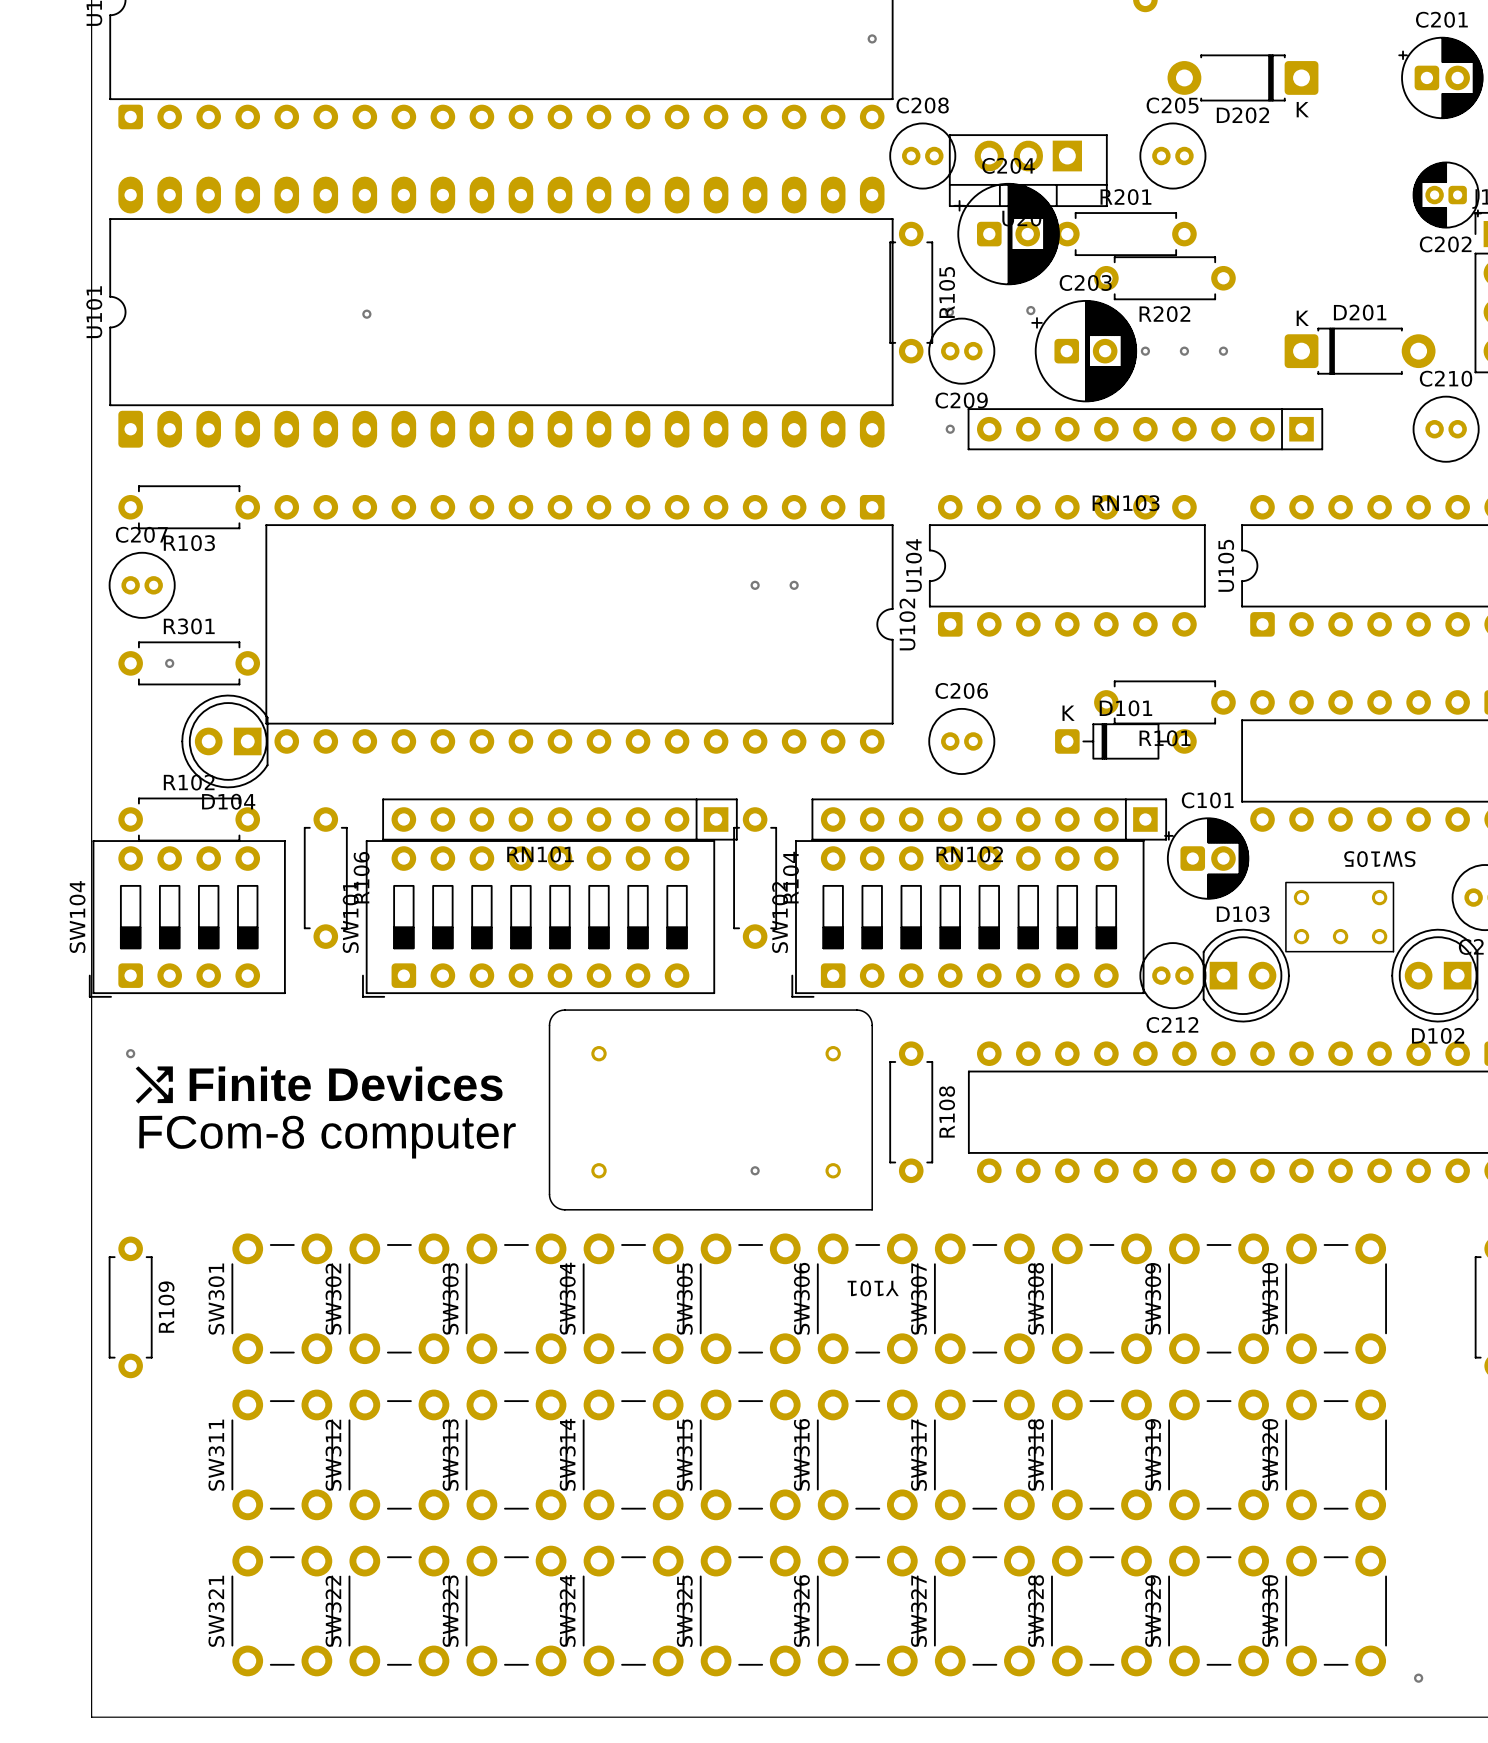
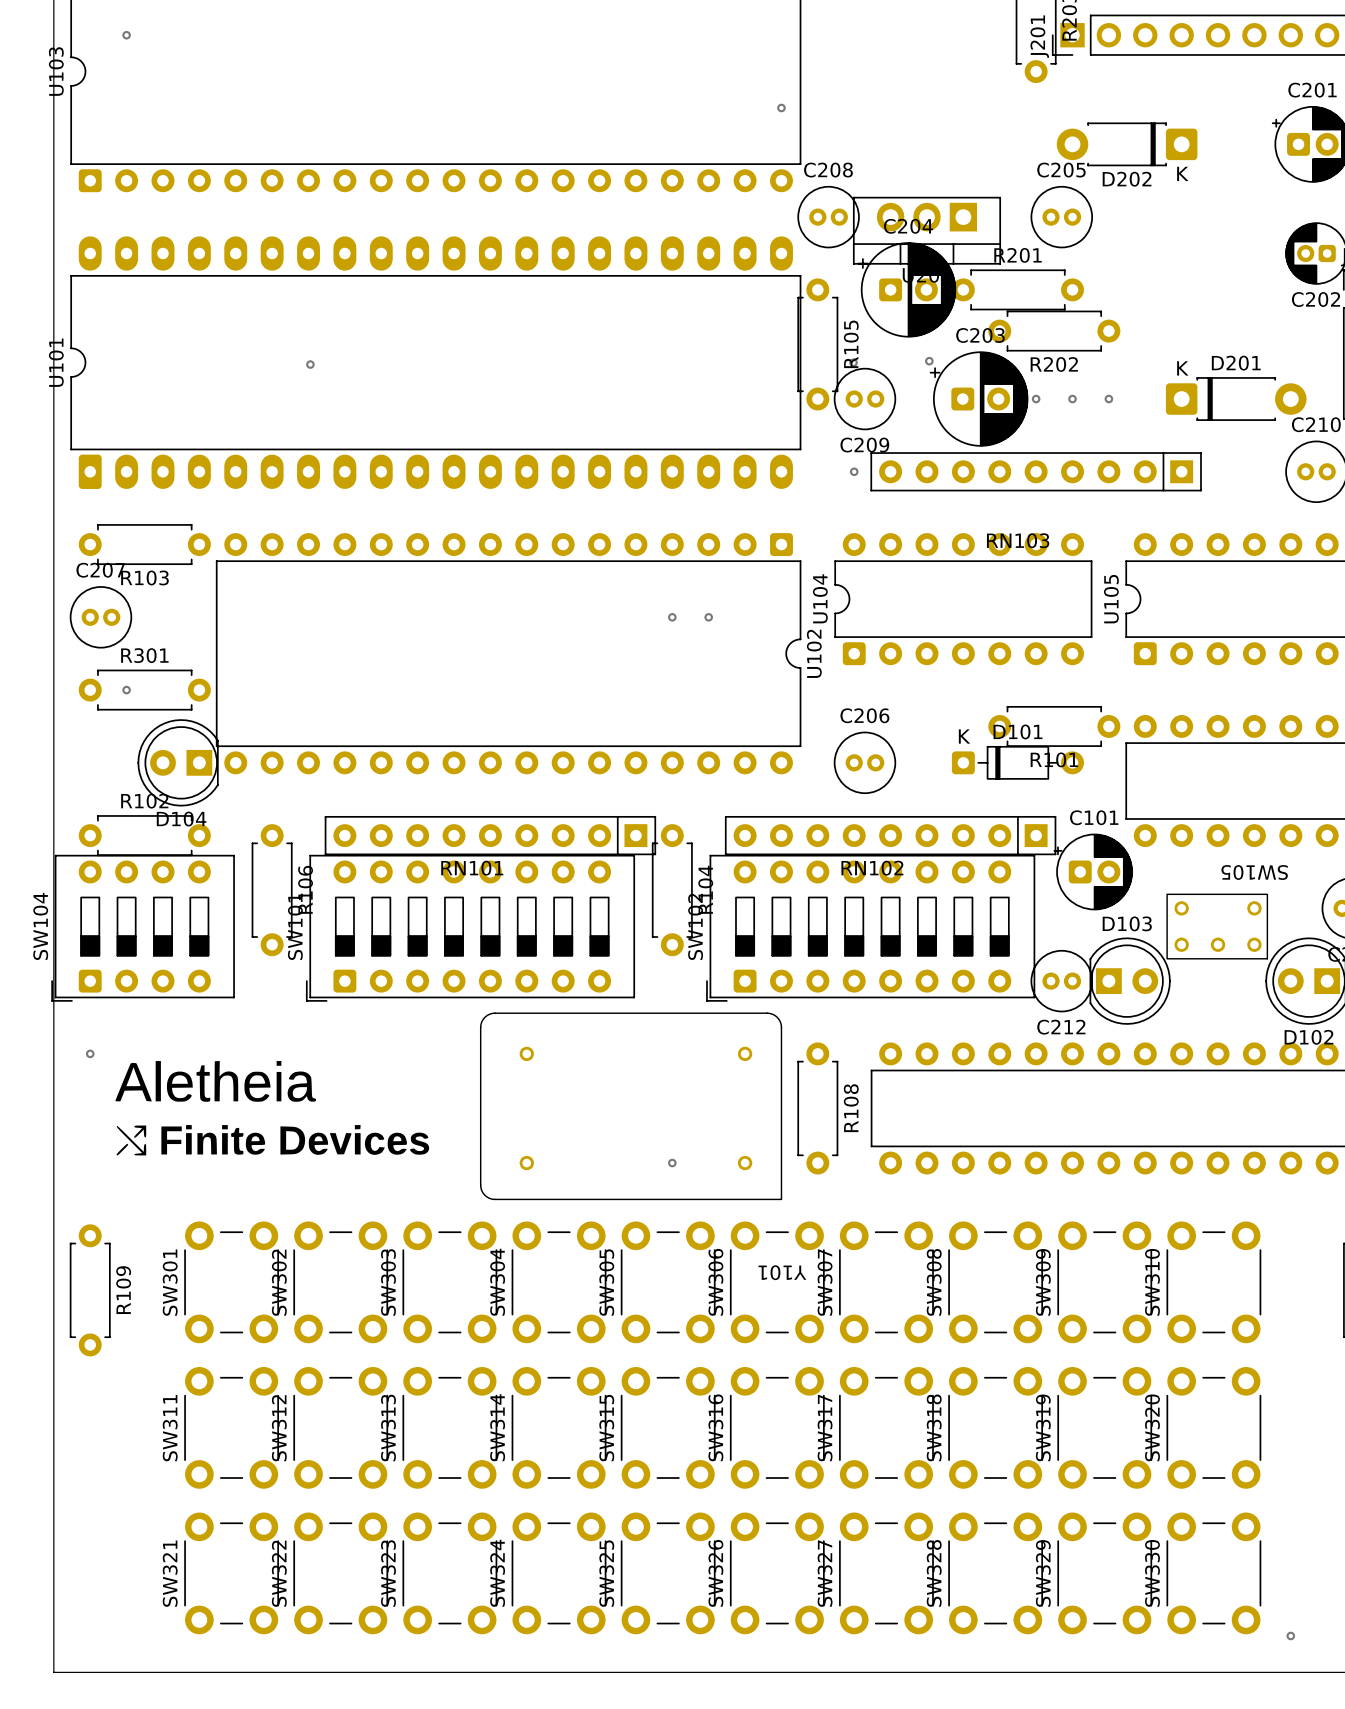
drawing shape: [135, 1066, 516, 1159] -> [115, 1060, 430, 1156]

